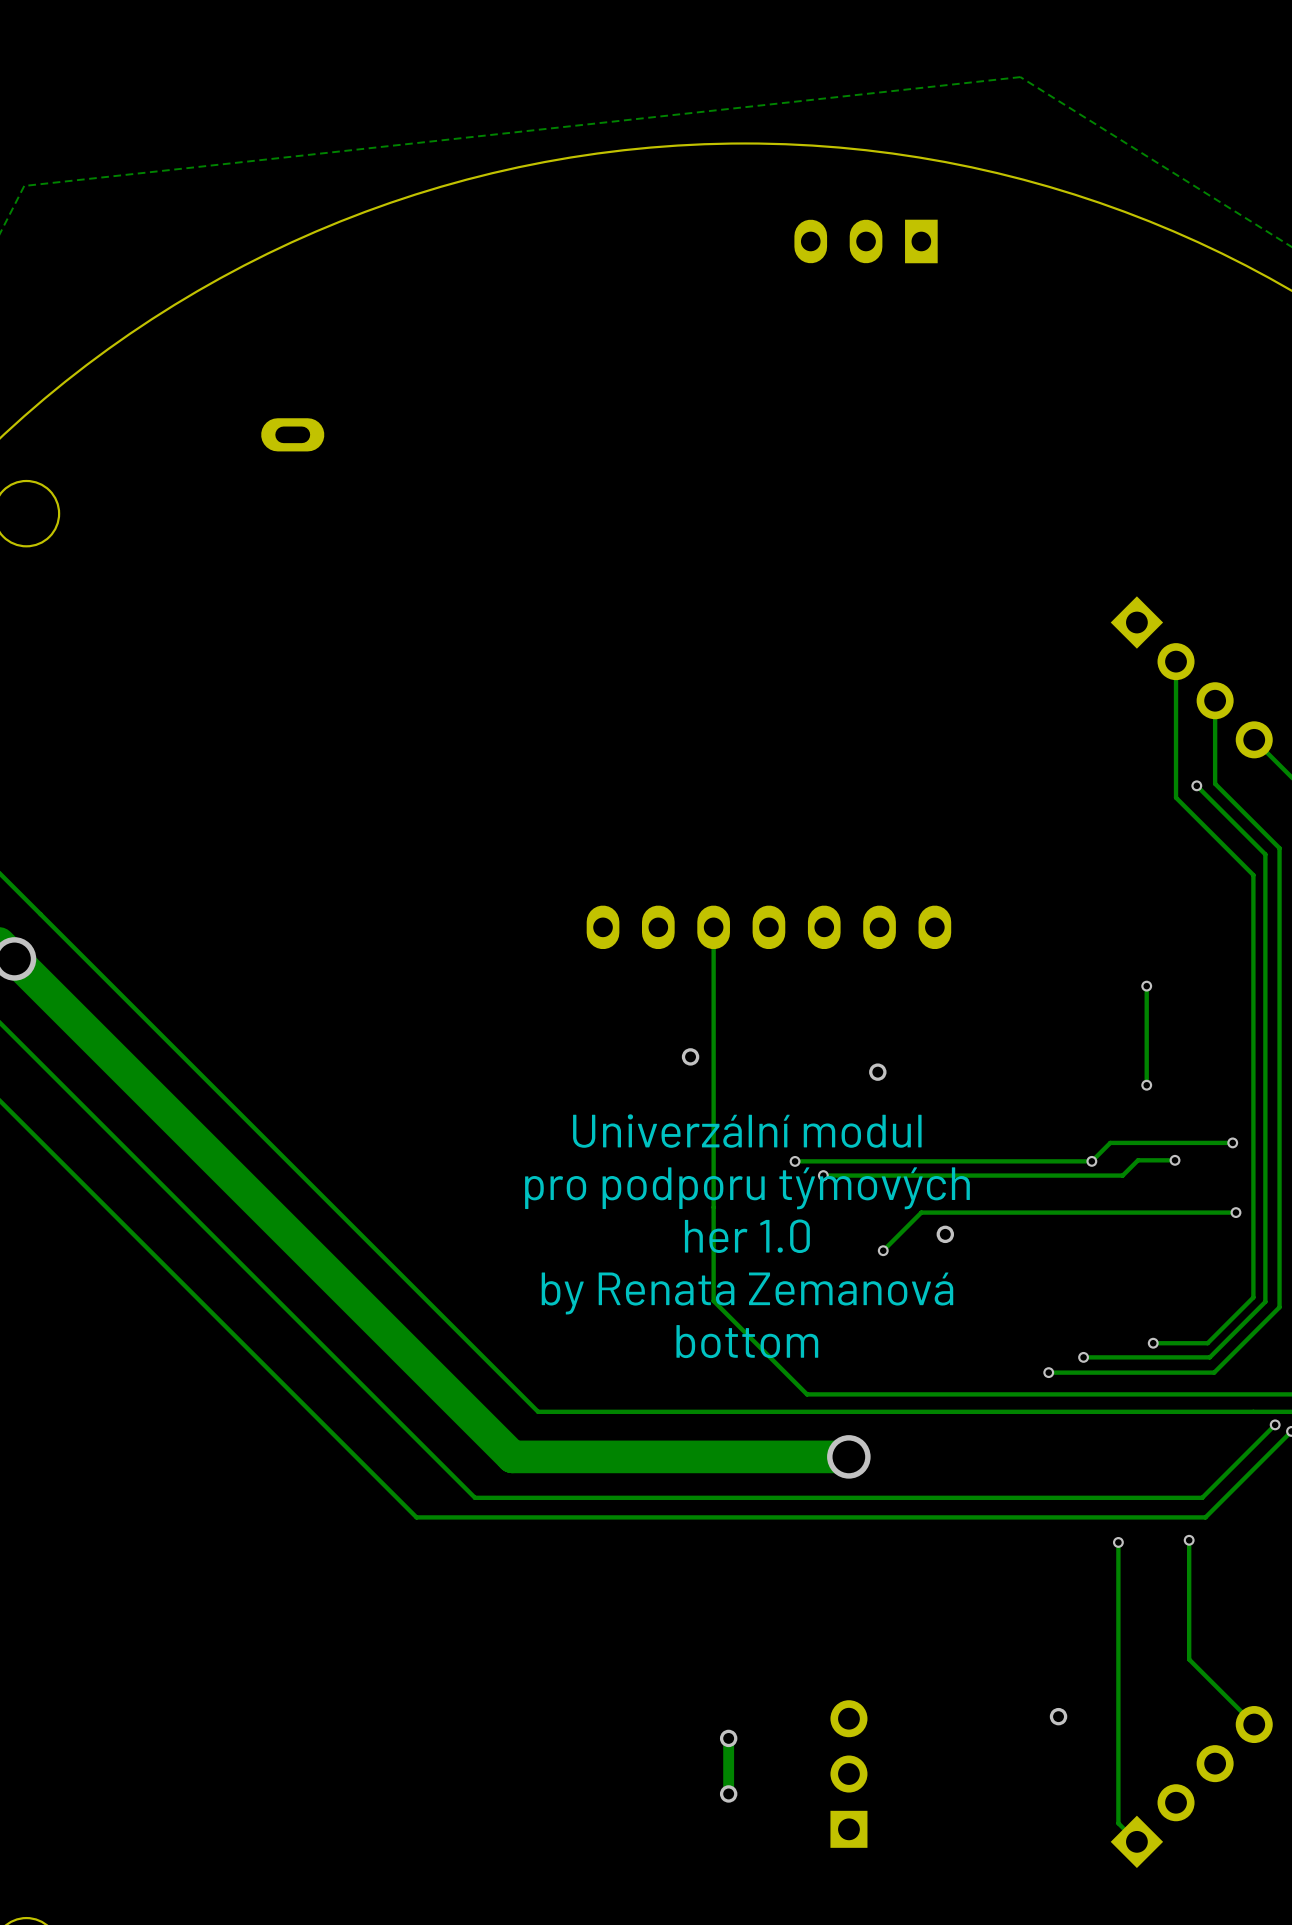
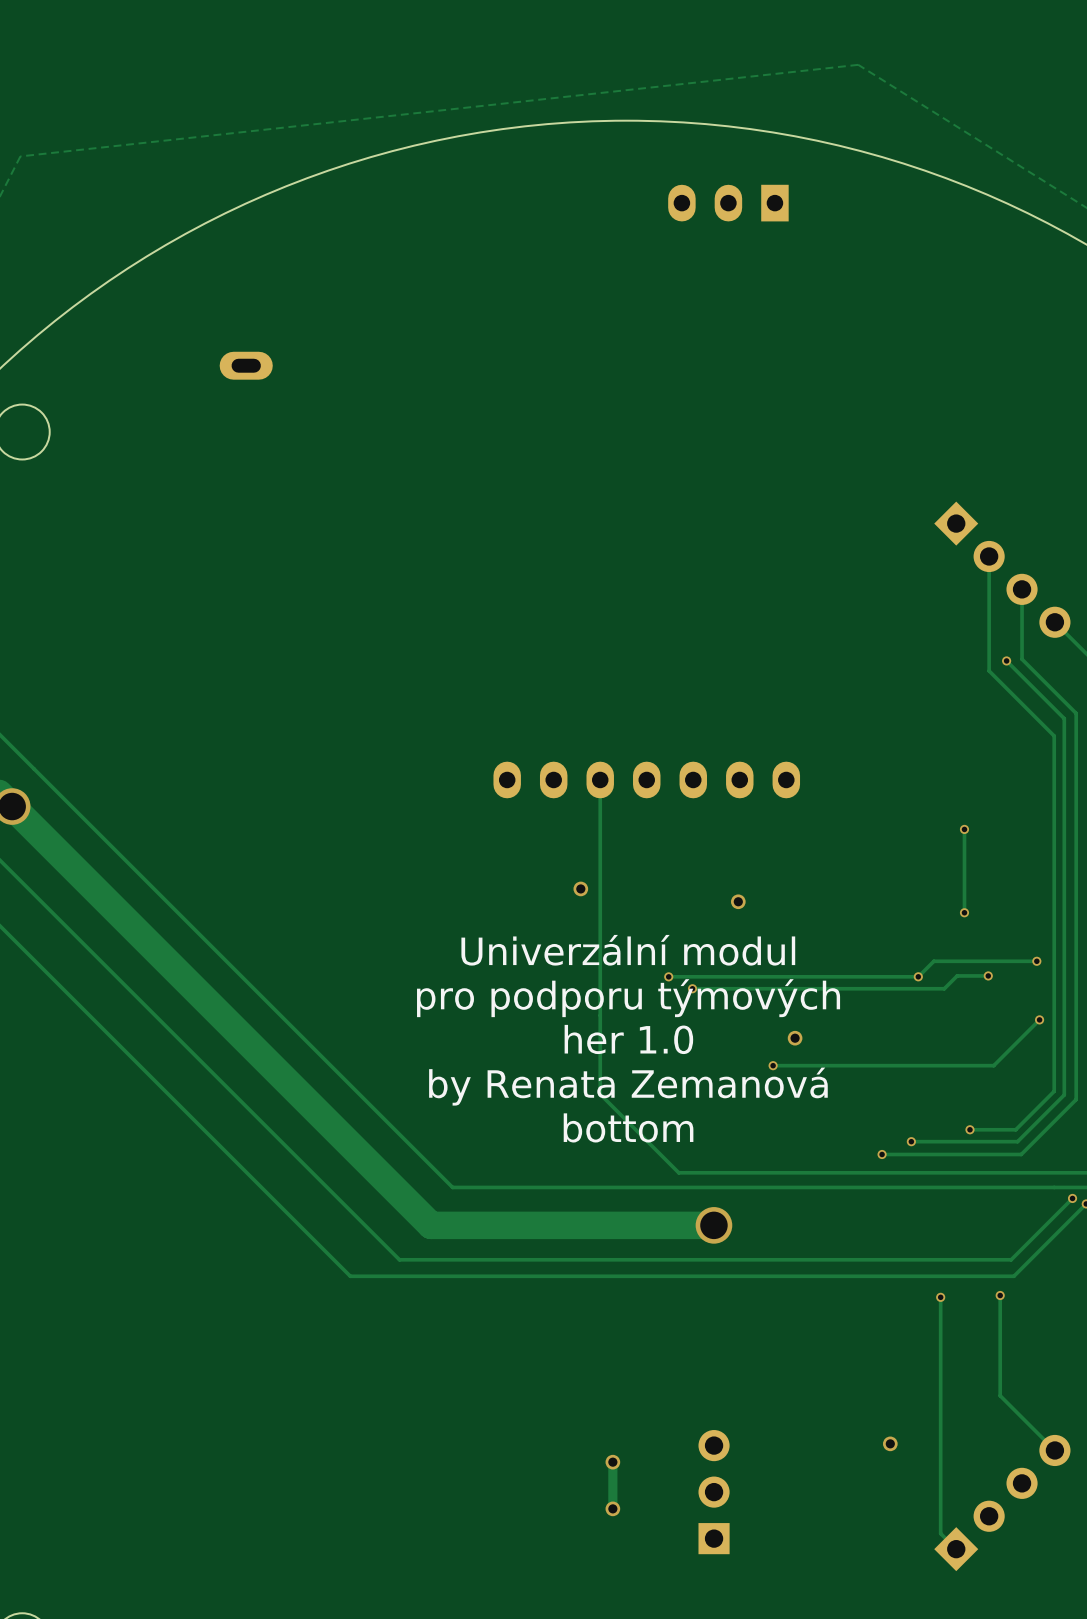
track: (1235, 1212) (921, 1212) (883, 1250) -> (1039, 1019) (993, 1065) (773, 1065)
via position: (883, 1250) -> (773, 1065)

